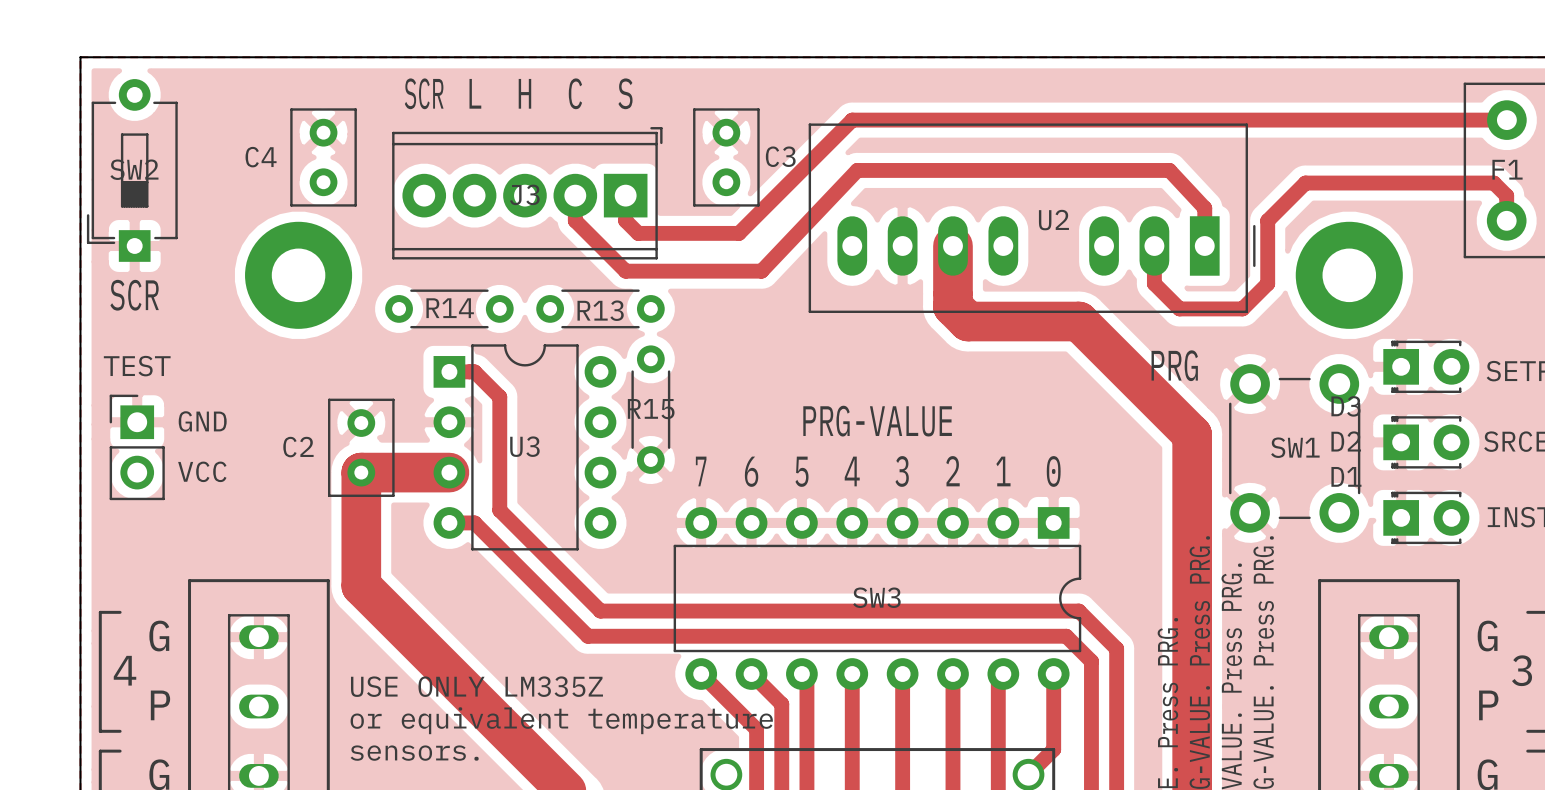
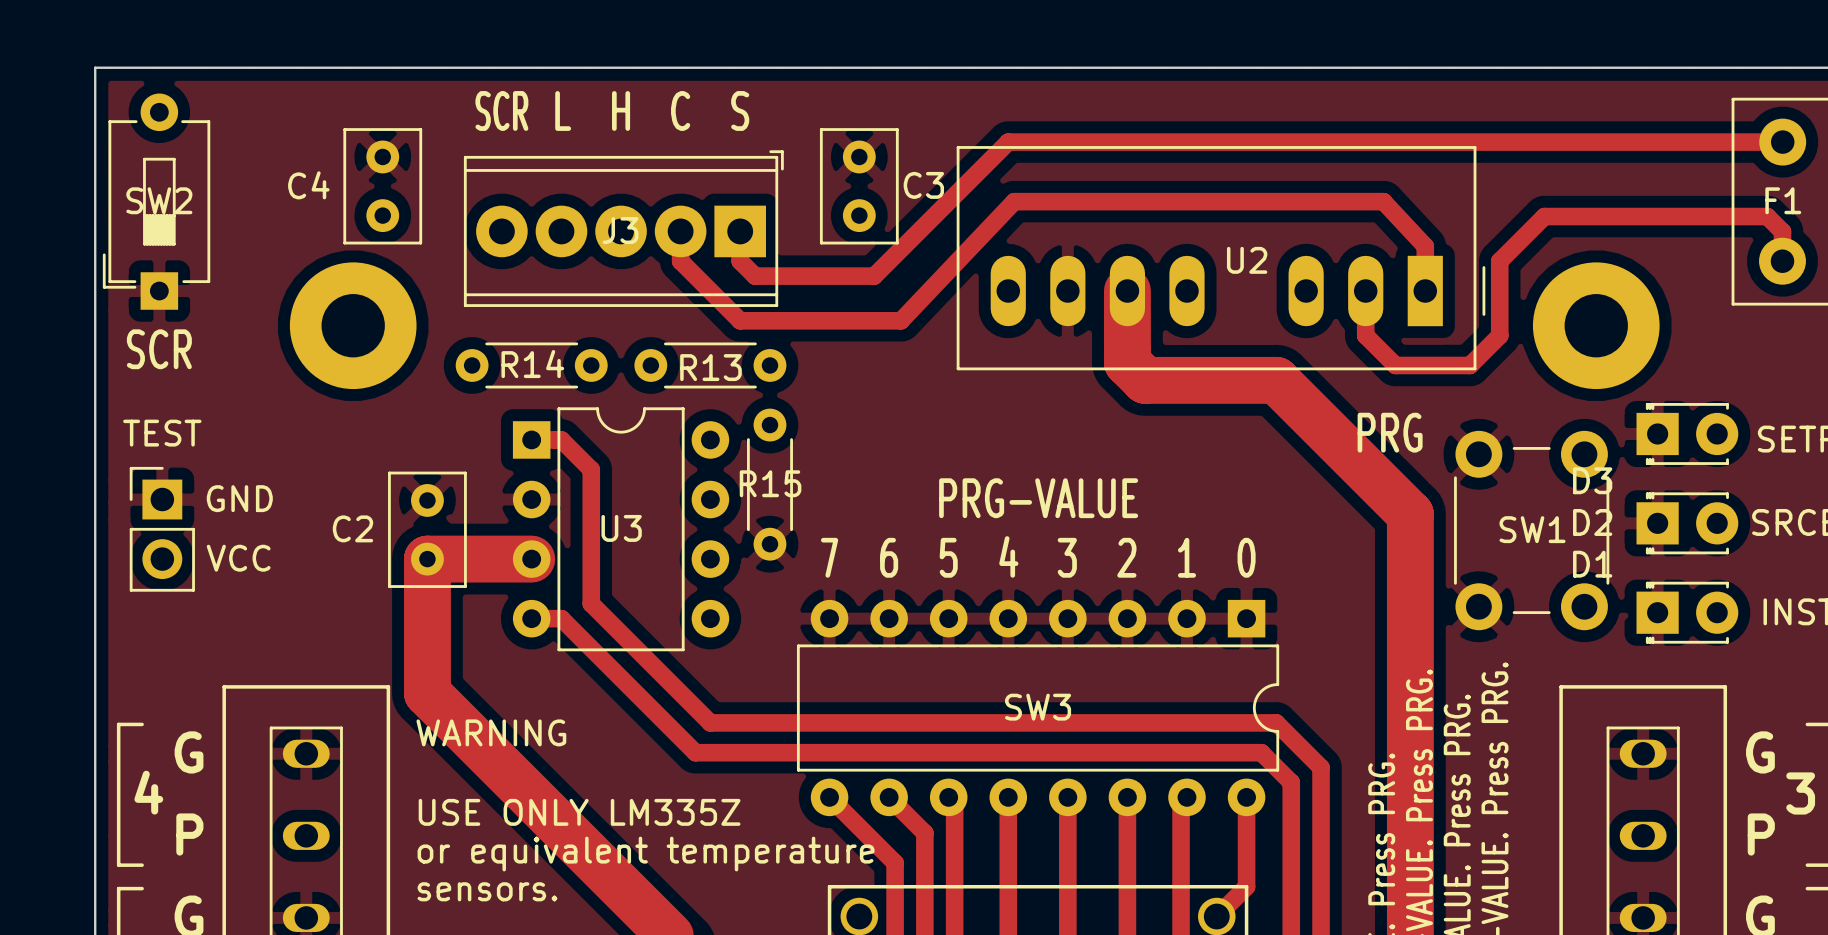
text: none -> WARNING (491, 732)

